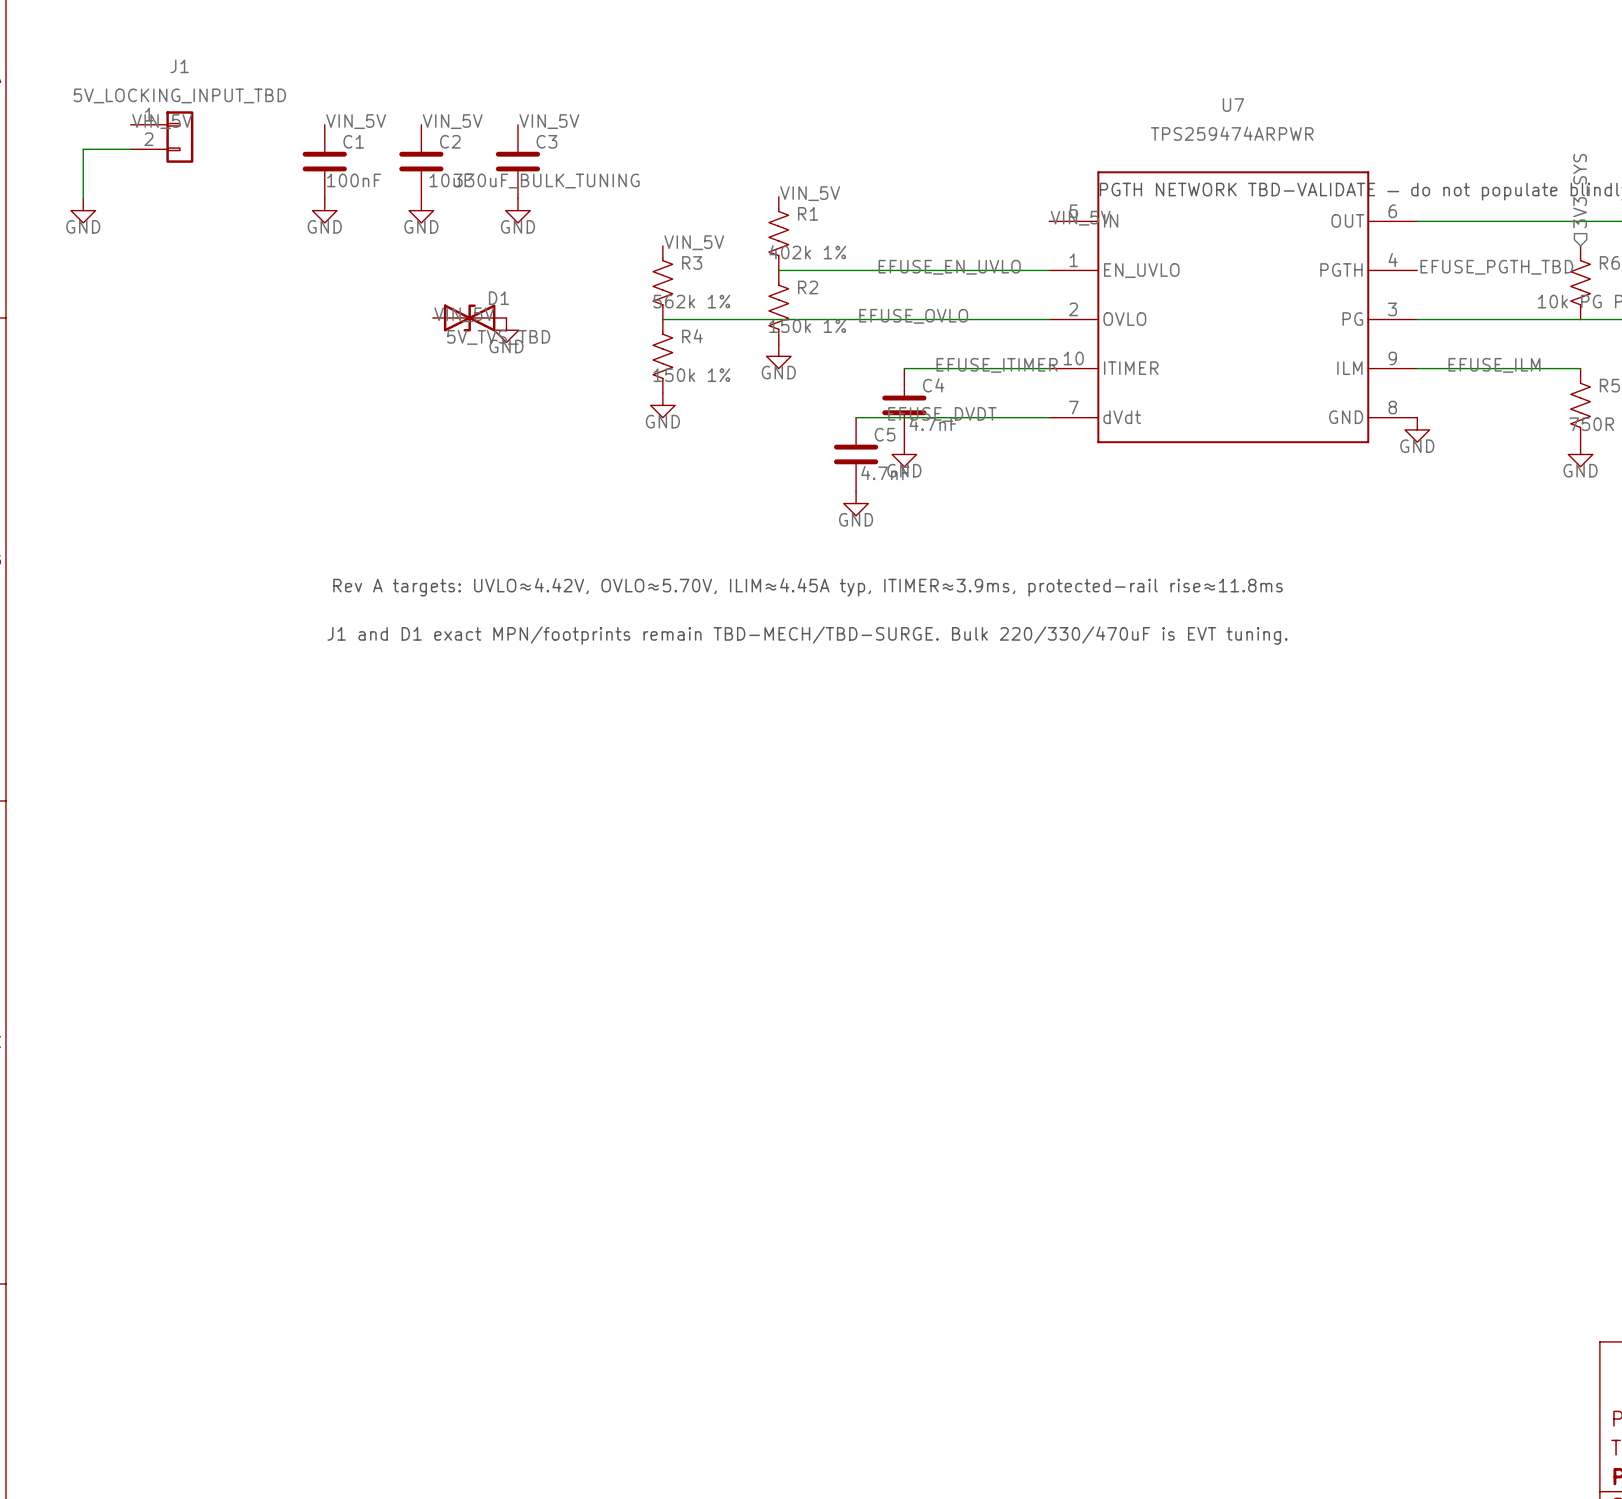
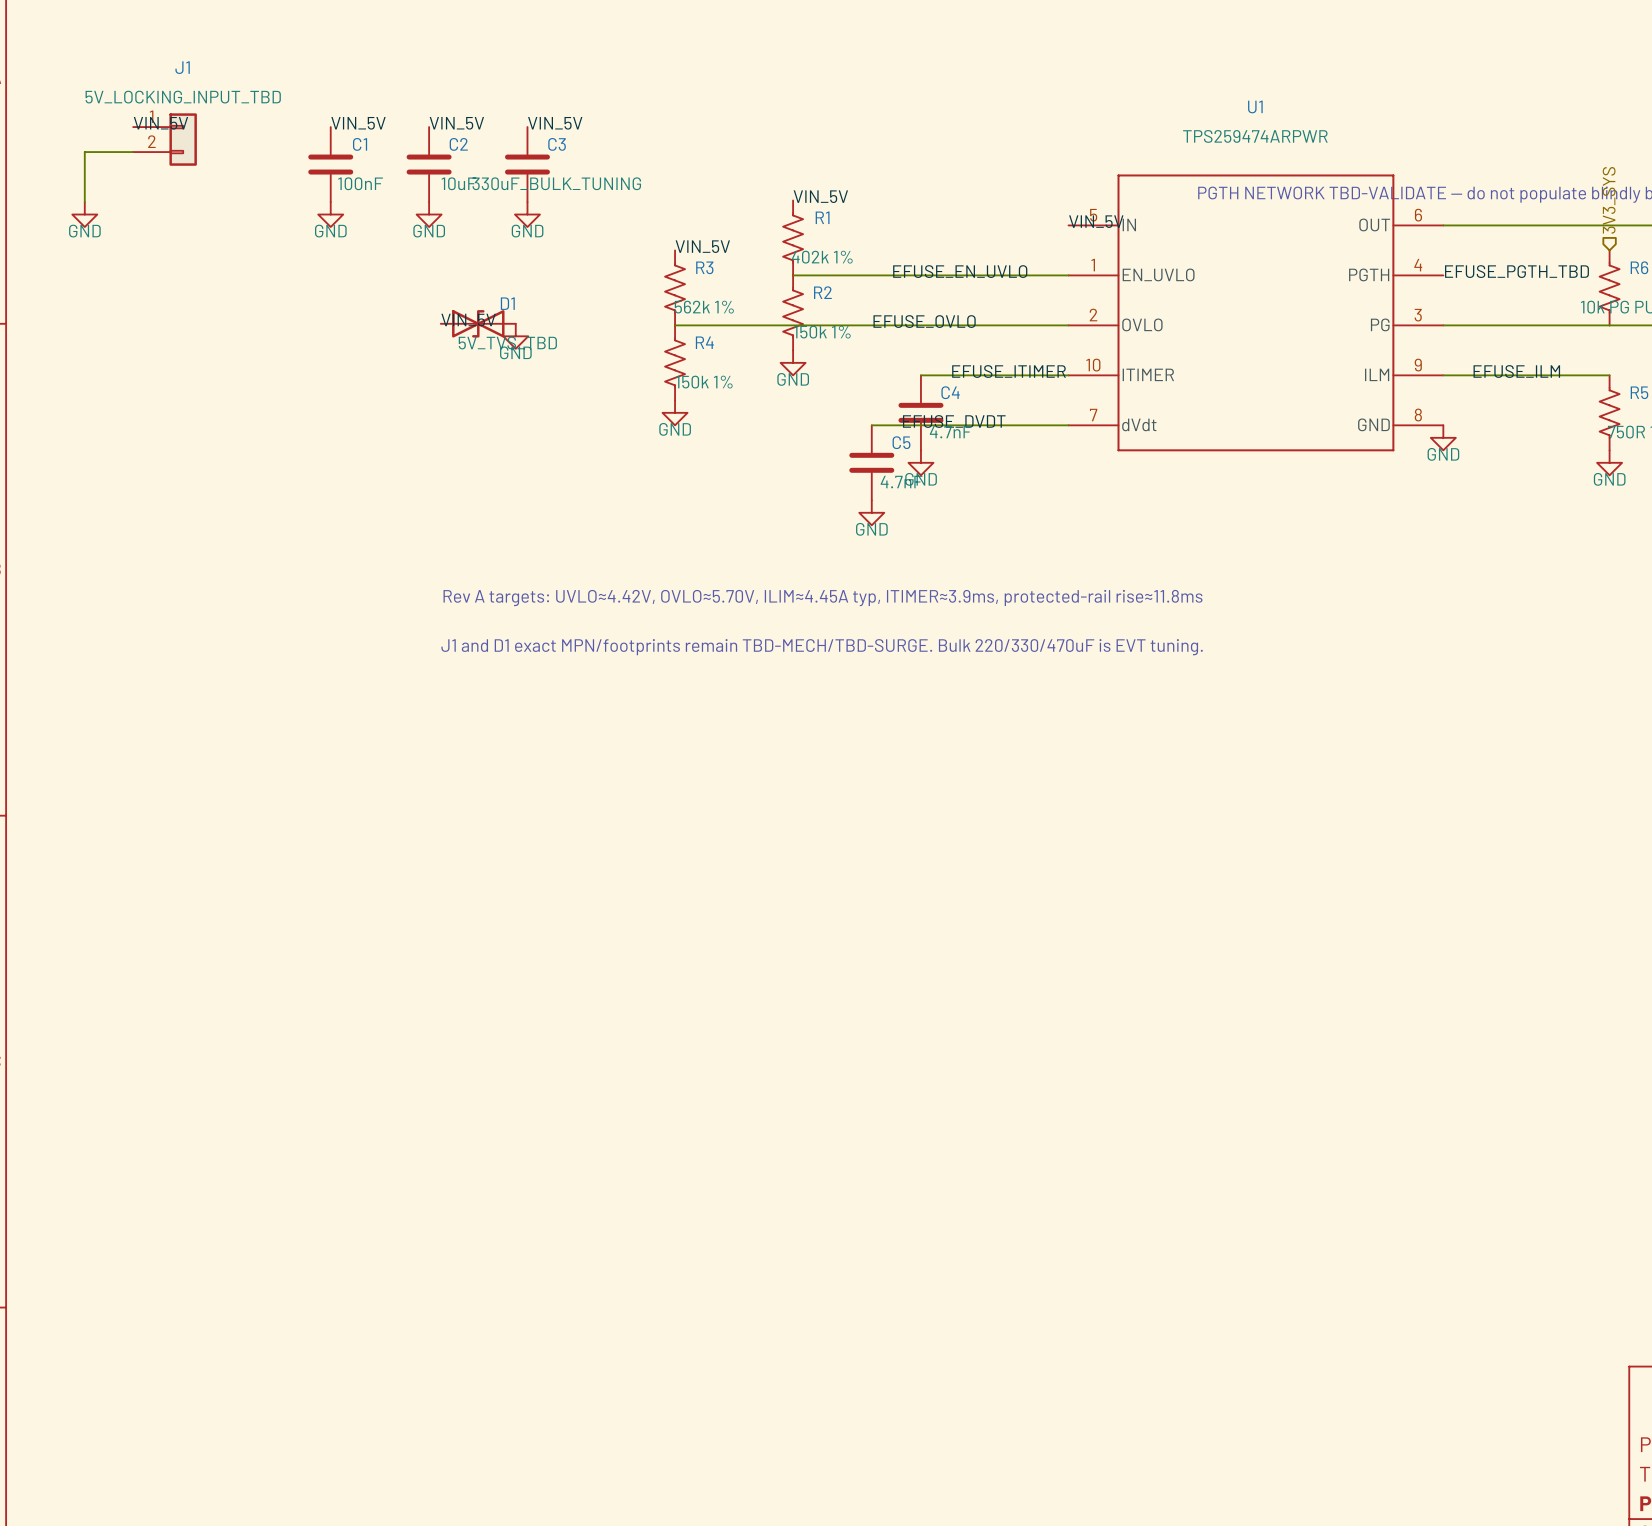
U7 name: U7 (1233, 104) -> U1 (1255, 106)

